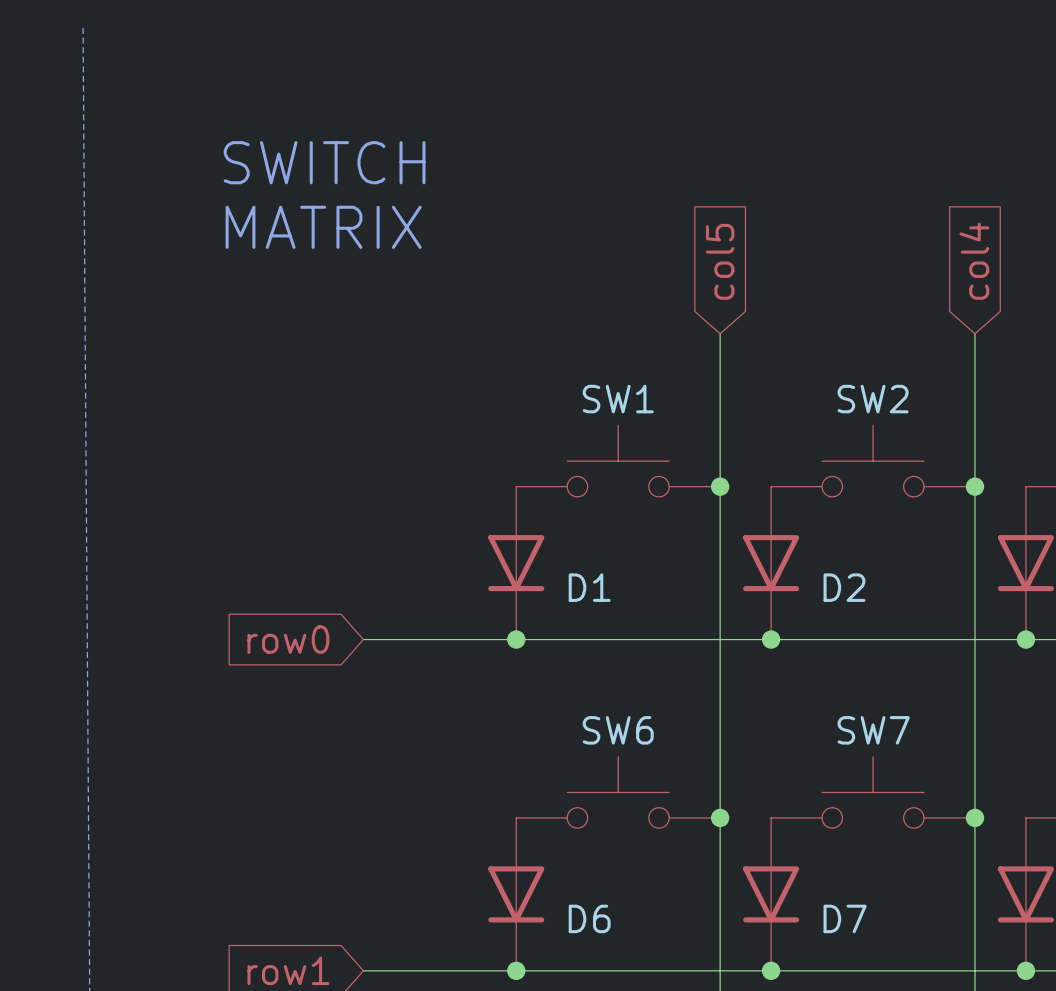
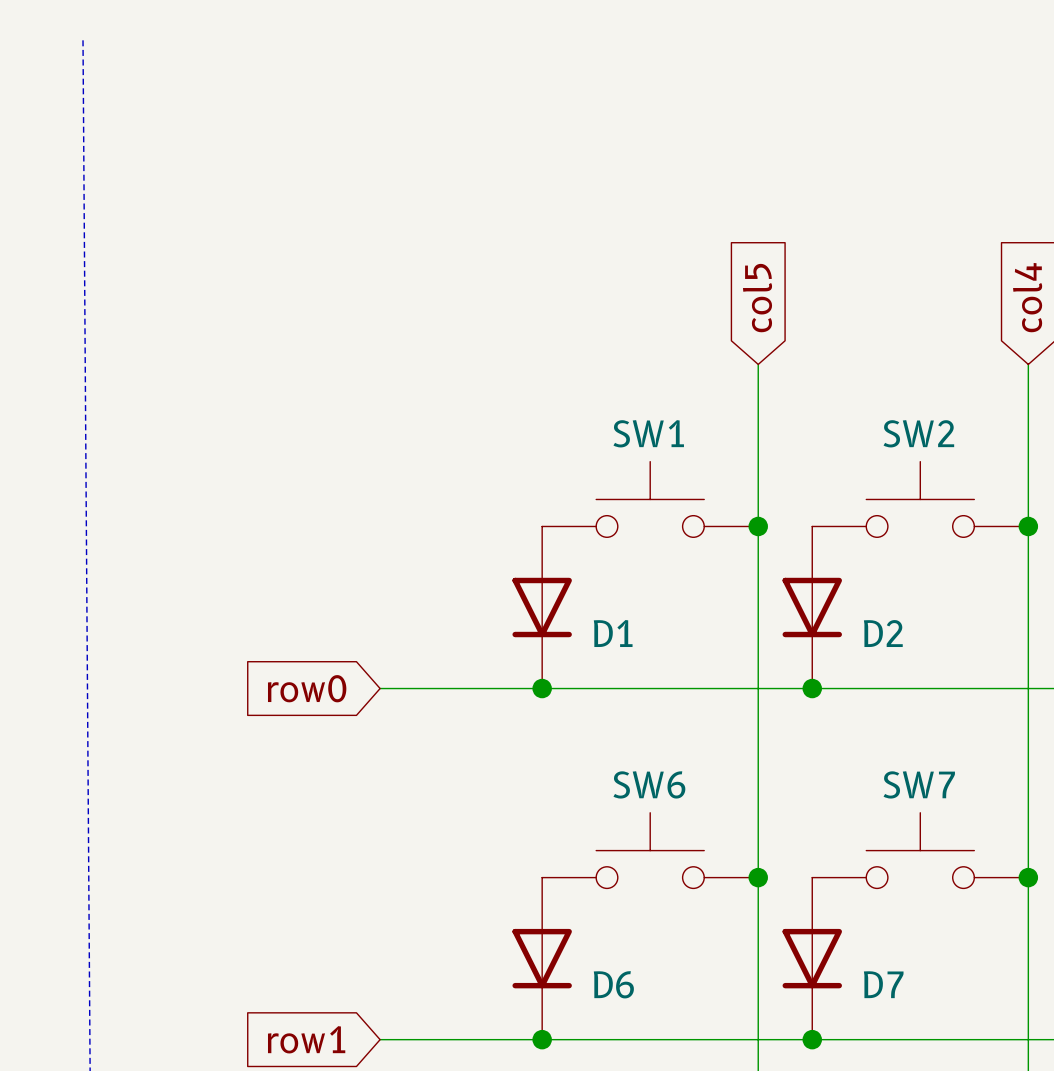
text: SWITCH (324, 162) -> none
text: MATRIX (323, 227) -> none

